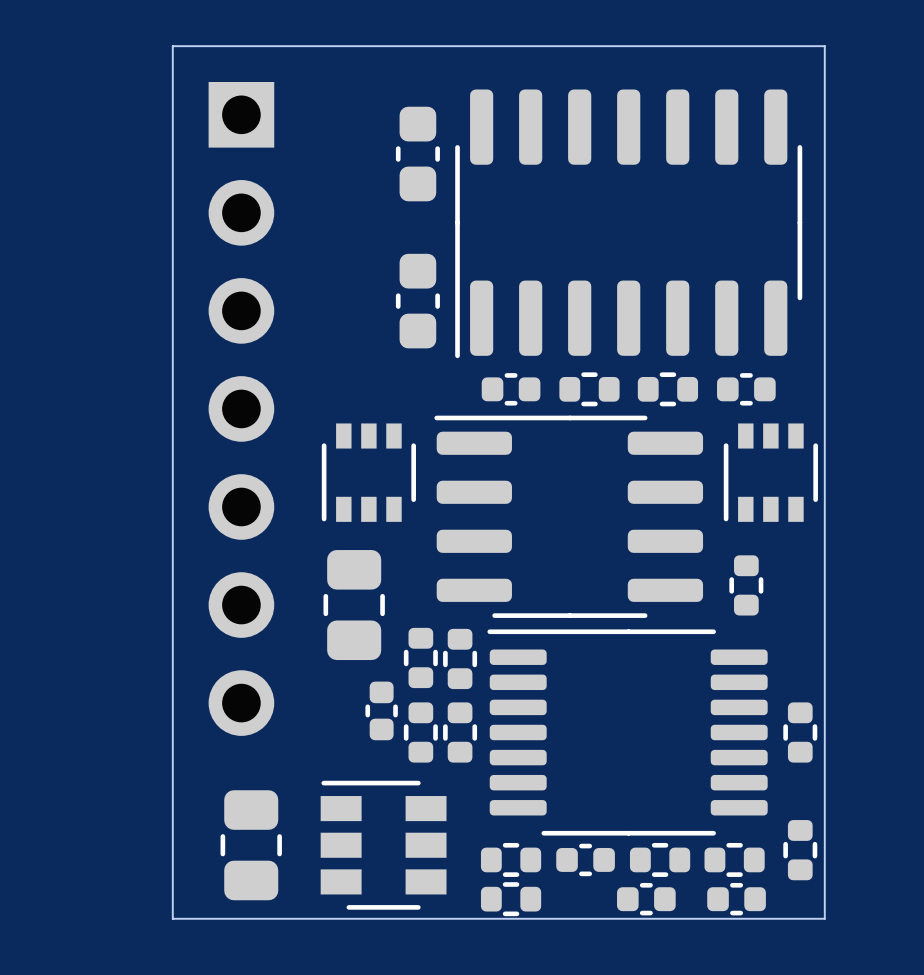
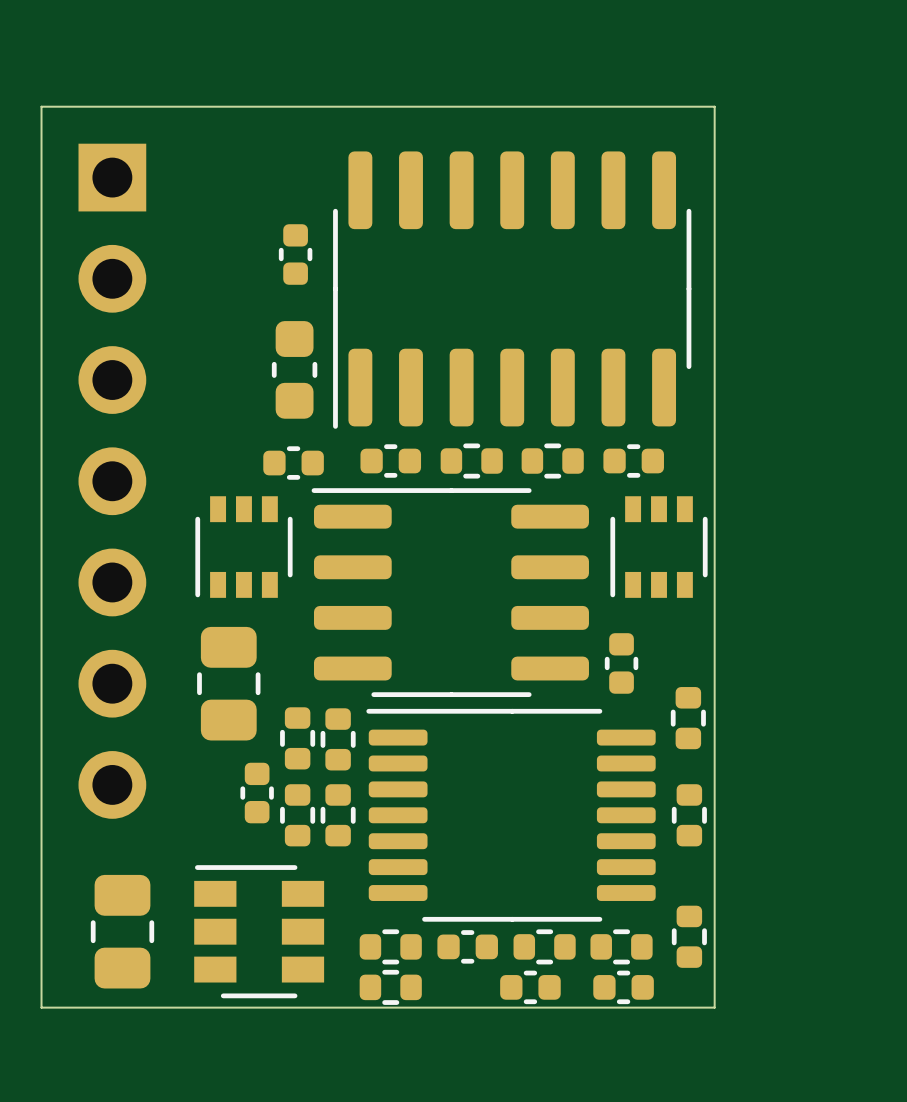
part footprint: [395, 106, 440, 202] -> [278, 224, 313, 285]
part: none -> (293, 463)
part footprint: [729, 555, 764, 616] -> [604, 633, 639, 694]
part: none -> (688, 718)

